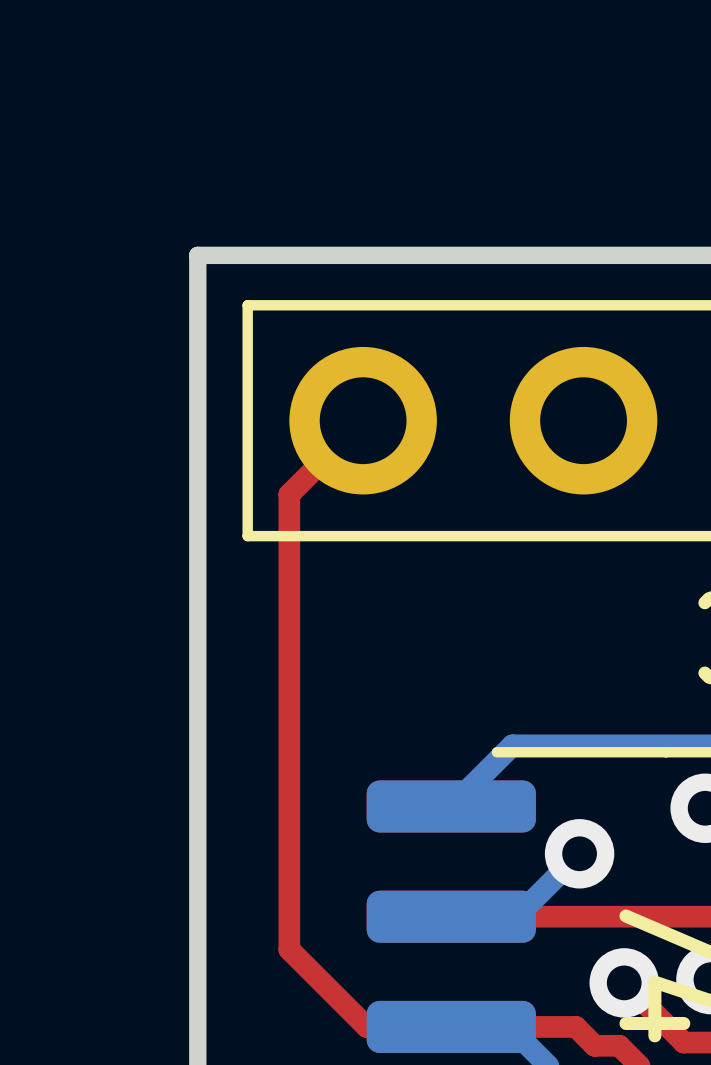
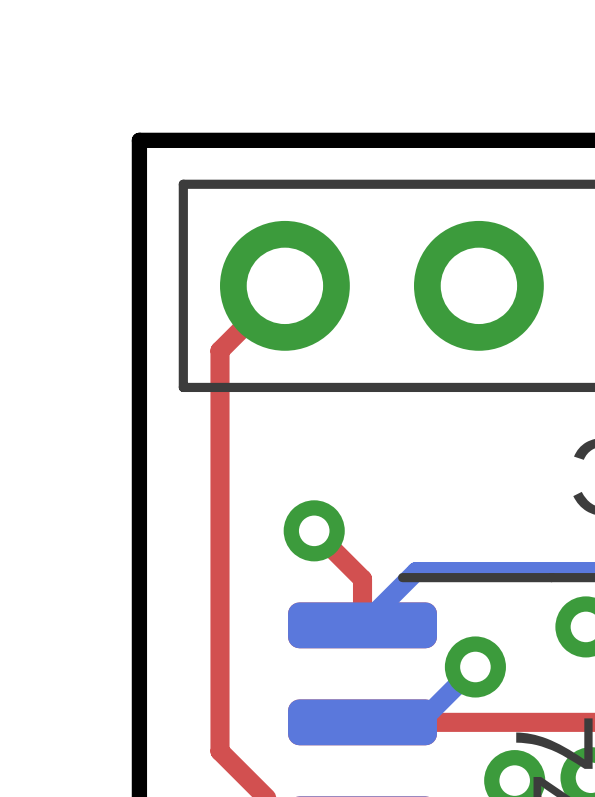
top track: none -> (314, 530) (362, 579) (362, 625)
via: none -> (314, 530)

